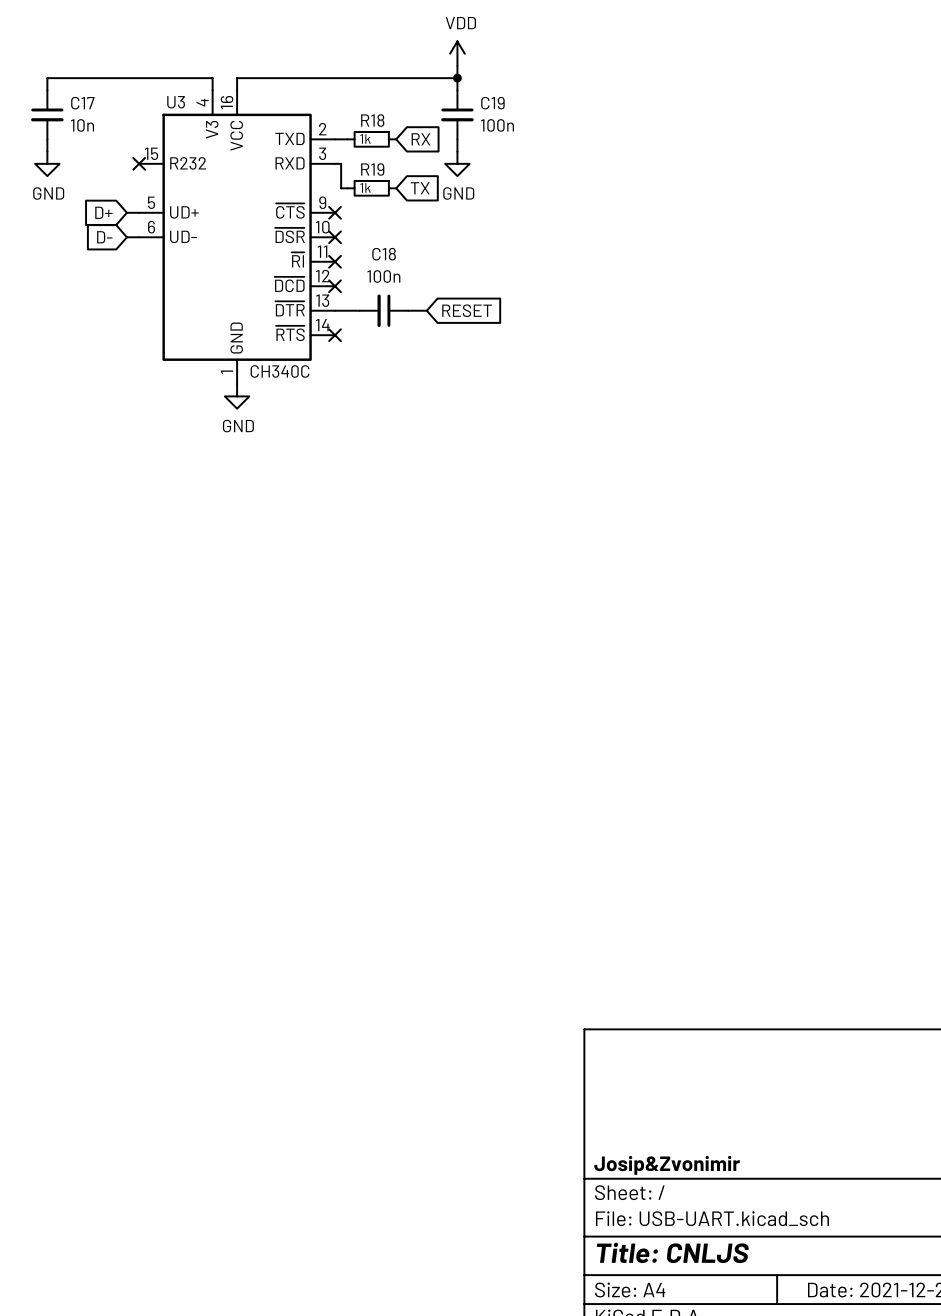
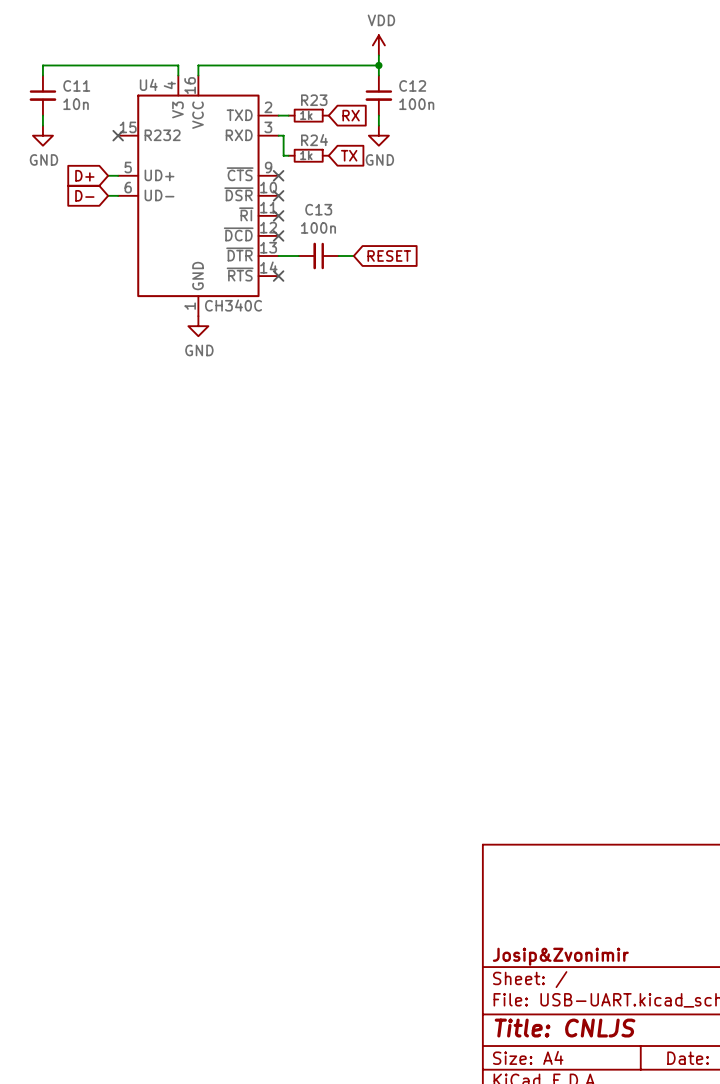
U3 name: U3 (176, 102) -> U4 (148, 84)
C17 name: C17 (82, 103) -> C11 (76, 85)
C19 name: C19 (492, 103) -> C12 (412, 85)
R18 name: R18 (372, 120) -> R23 (314, 100)
R19 name: R19 (372, 169) -> R24 (314, 140)
C18 name: C18 (384, 254) -> C13 (318, 209)

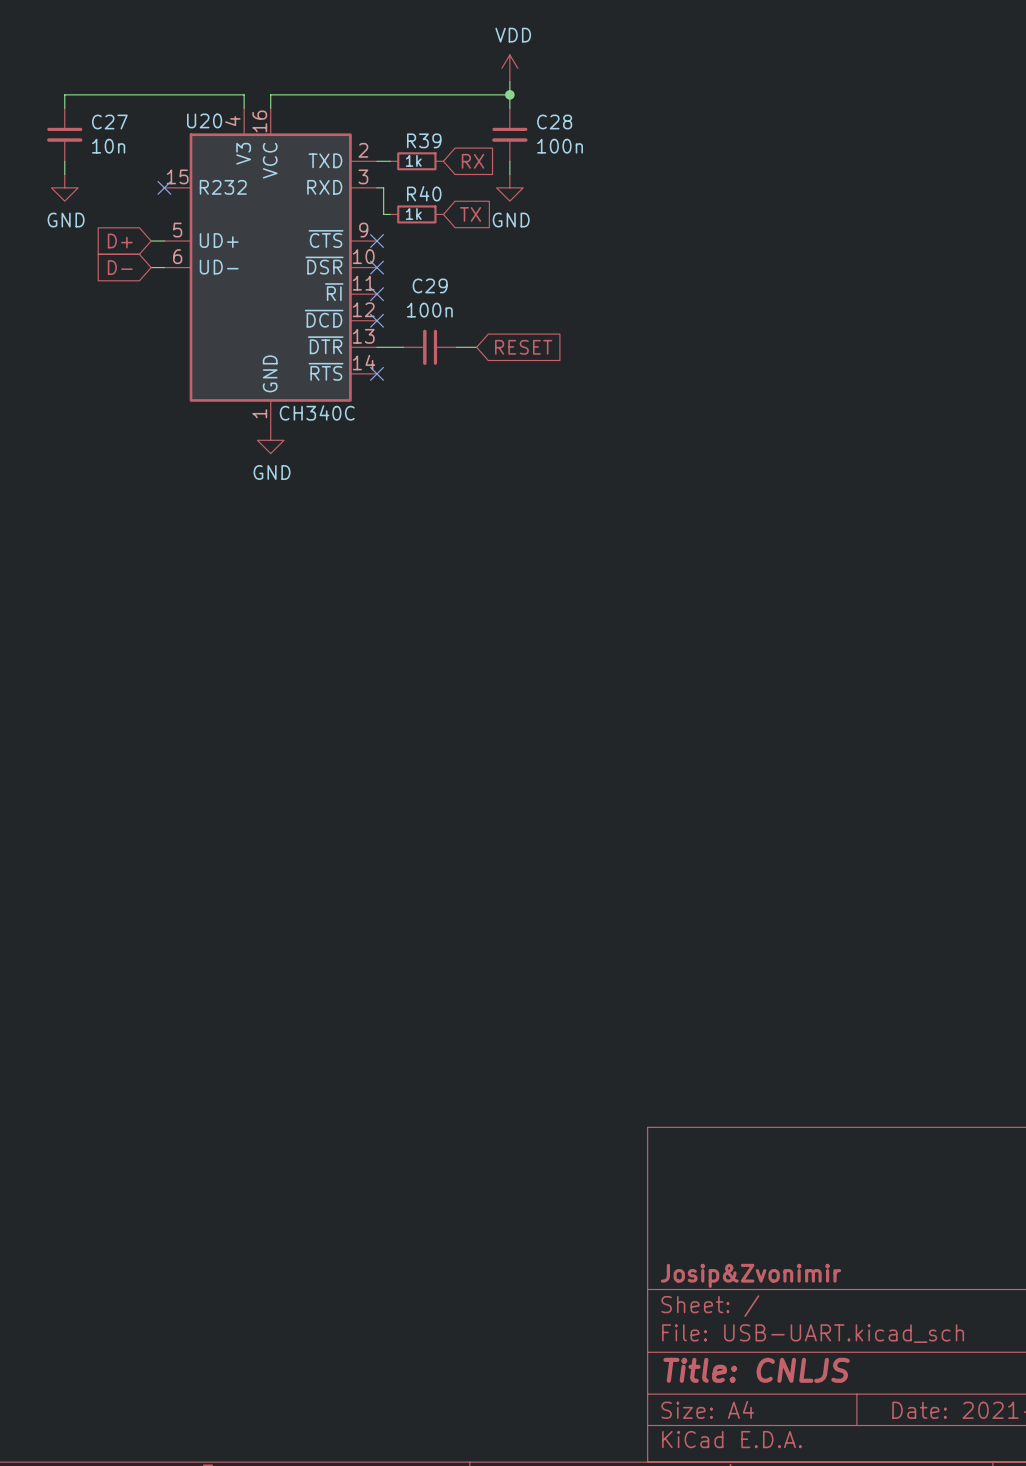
U4 name: U4 (148, 84) -> U20 (204, 120)
C11 name: C11 (76, 85) -> C27 (109, 122)
C12 name: C12 (412, 85) -> C28 (554, 122)
R23 name: R23 (314, 100) -> R39 (424, 140)
R24 name: R24 (314, 140) -> R40 (424, 193)
C13 name: C13 (318, 209) -> C29 (430, 285)

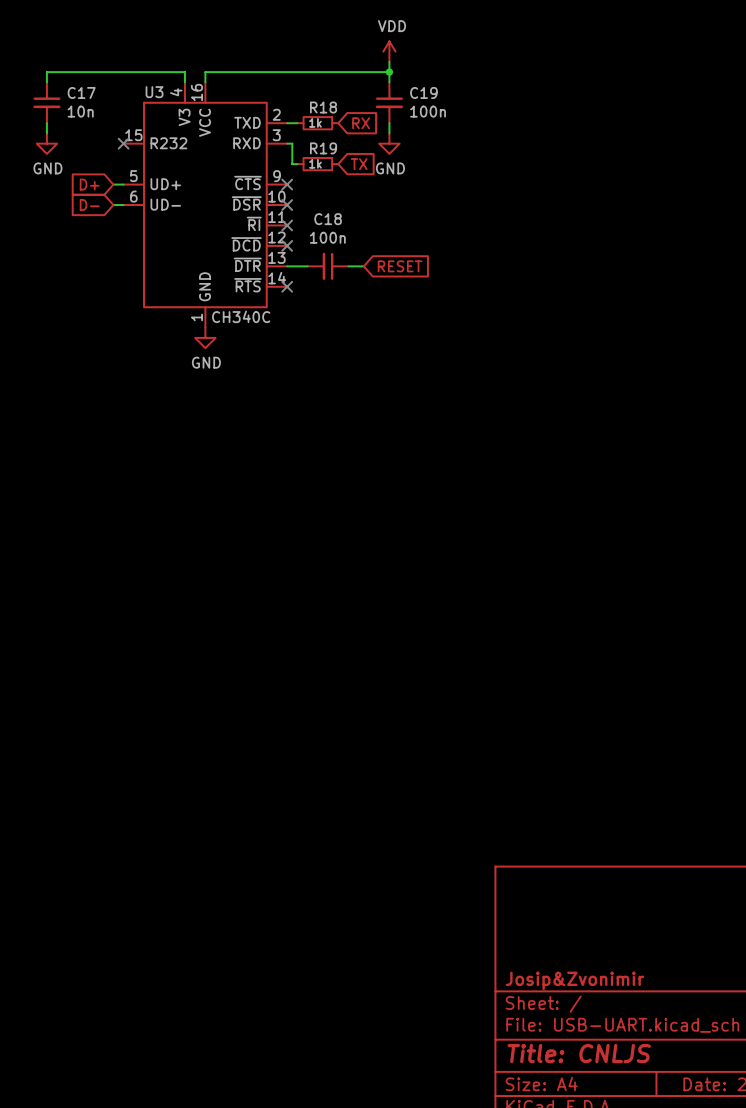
U20 name: U20 (204, 120) -> U3 (154, 92)
C27 name: C27 (109, 122) -> C17 (81, 92)
C28 name: C28 (554, 122) -> C19 (423, 92)
R39 name: R39 (424, 140) -> R18 (323, 107)
R40 name: R40 (424, 193) -> R19 (323, 148)
C29 name: C29 (430, 285) -> C18 (328, 219)

